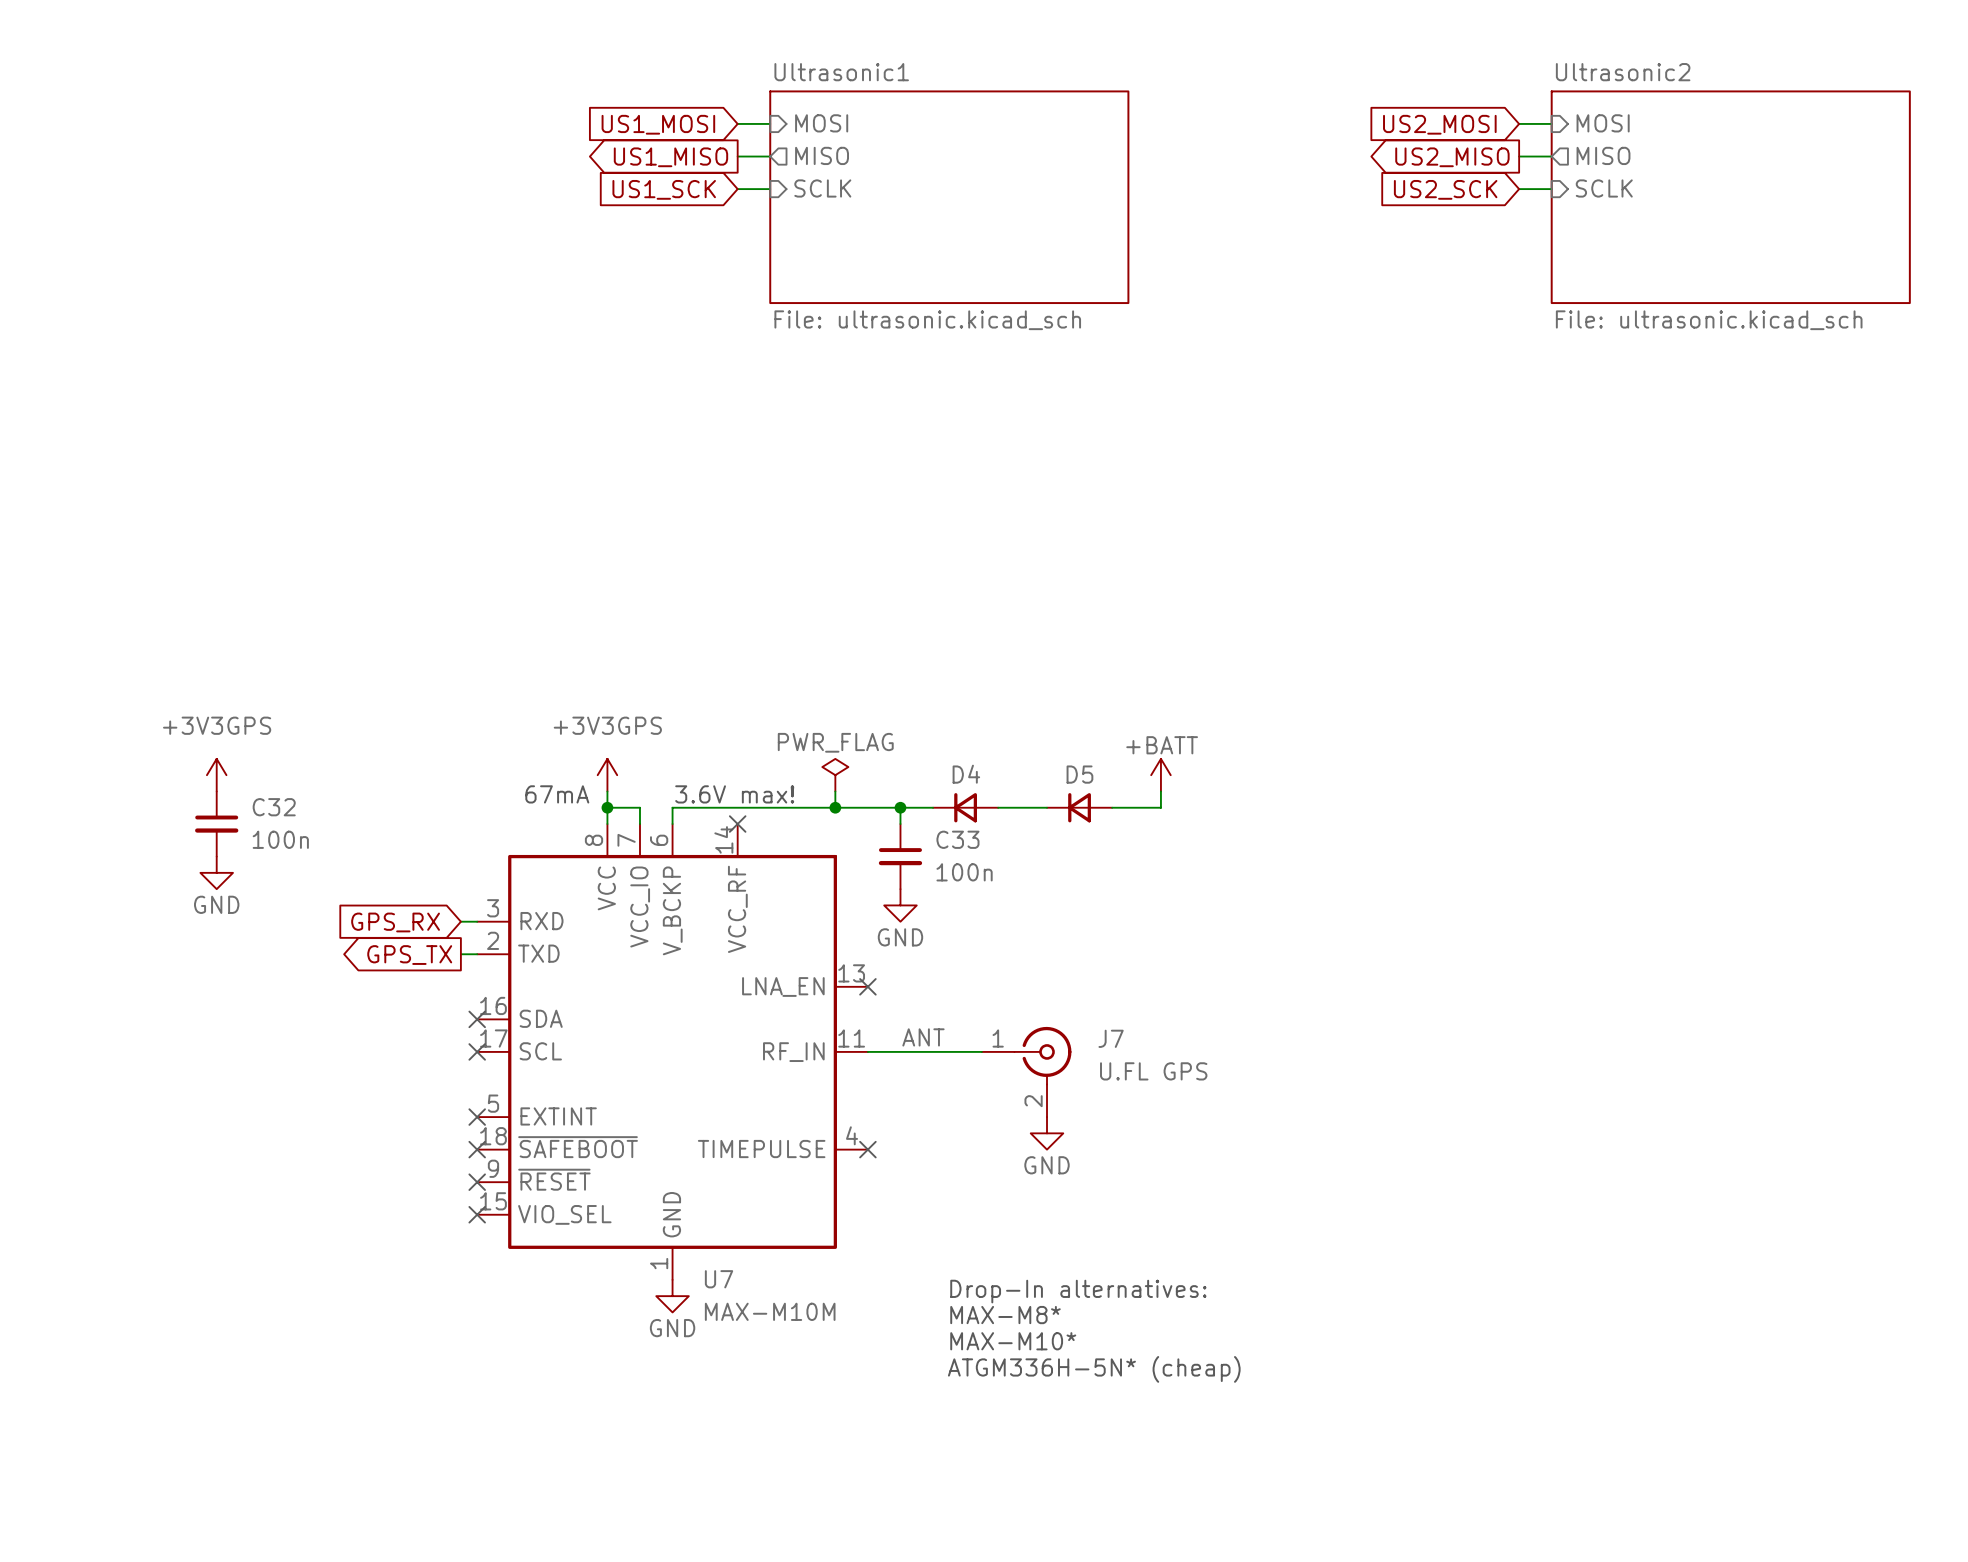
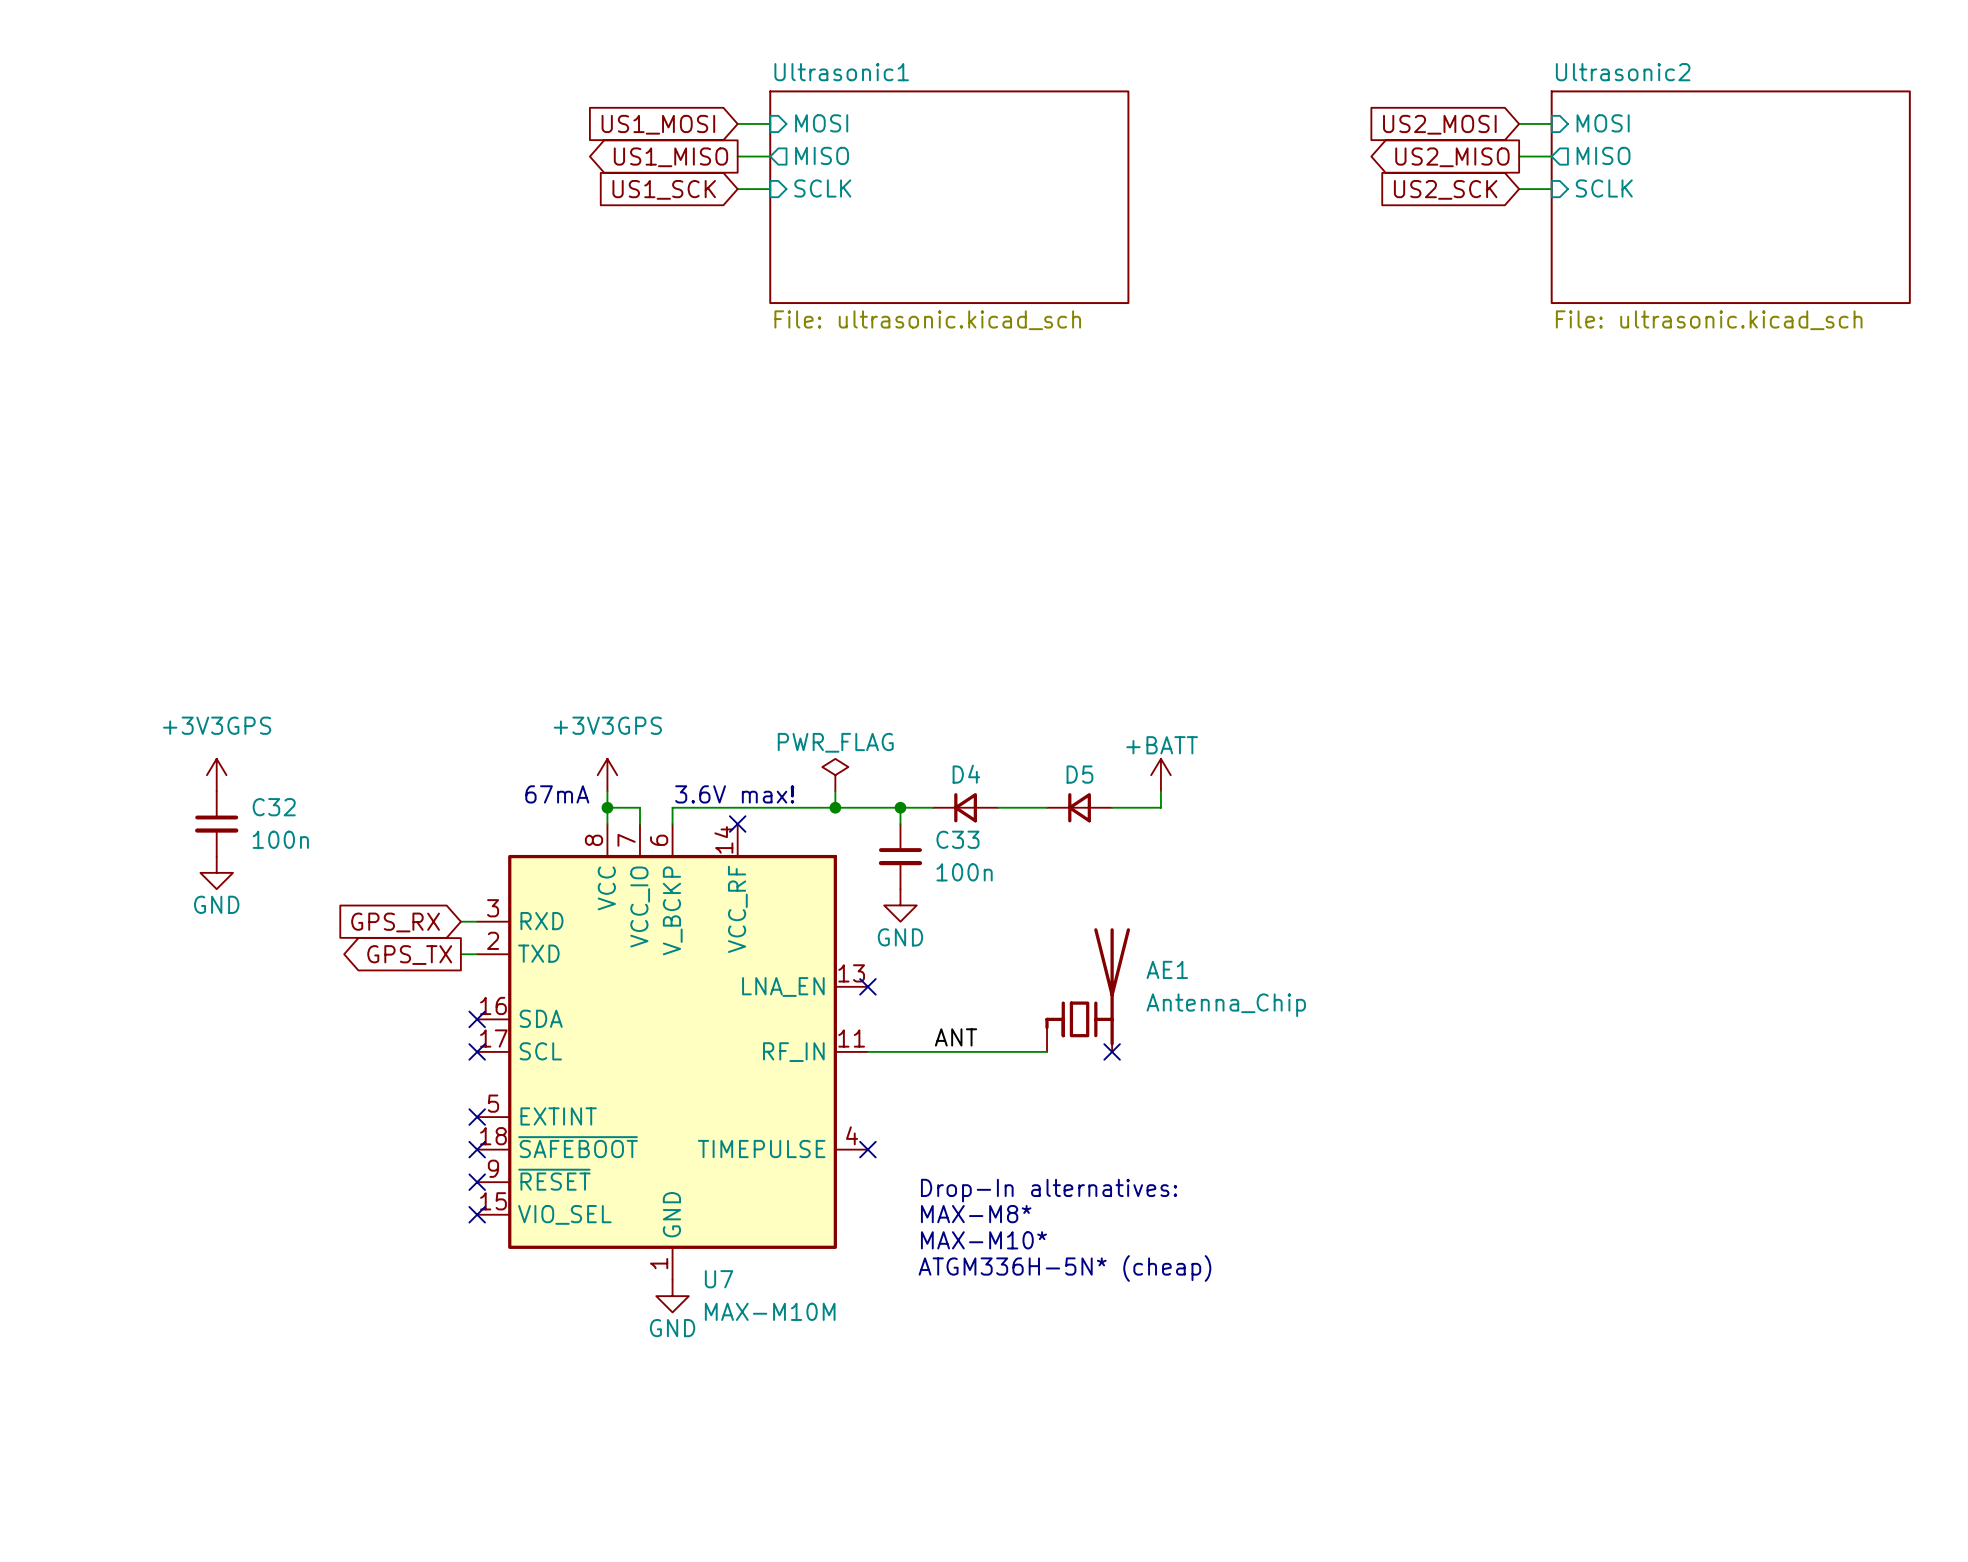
AE1: none -> Antenna_Chip (1087, 990)
label position: ANT (923, 1037) -> ANT (956, 1037)
no-connect mark: none -> (1112, 1051)
J7: U.FL GPS (1026, 1071) -> none
power symbol: GND (1047, 1133) -> none
text position: Drop-In alternatives: (1078, 1291) -> Drop-In alternatives: (1049, 1190)
text position: MAX-M8* (1005, 1315) -> MAX-M8* (976, 1214)
text position: MAX-M10* (1013, 1341) -> MAX-M10* (983, 1240)
text position: ATGM336H-5N* (cheap) (1094, 1369) -> ATGM336H-5N* (cheap) (1064, 1268)

